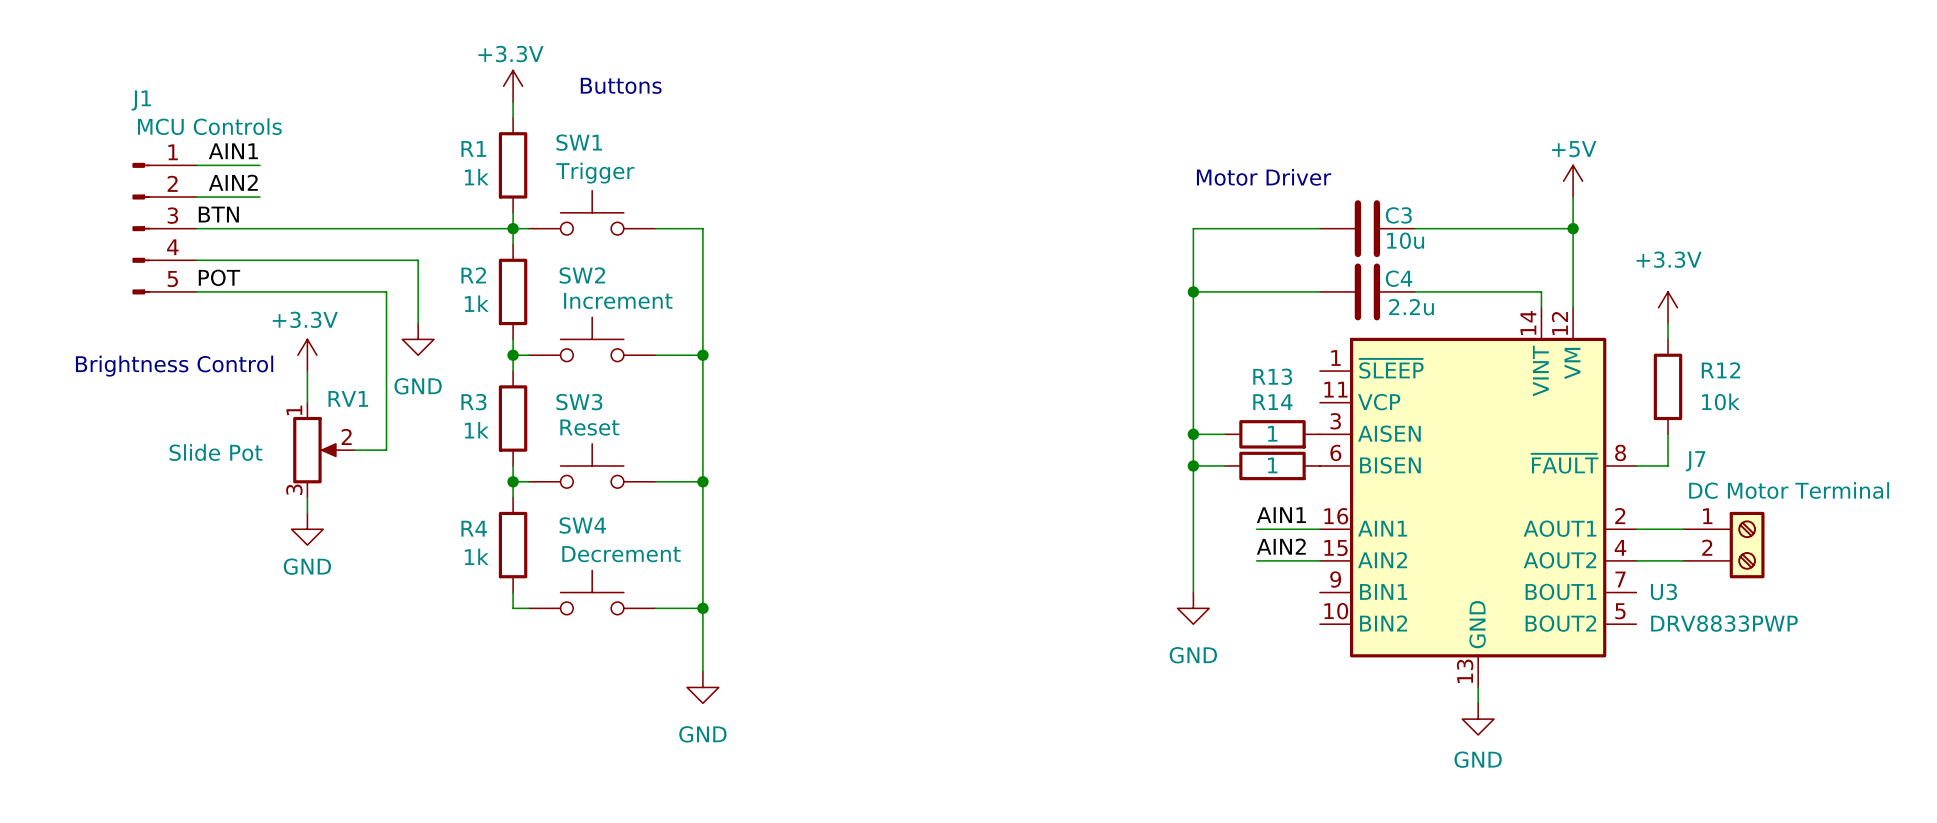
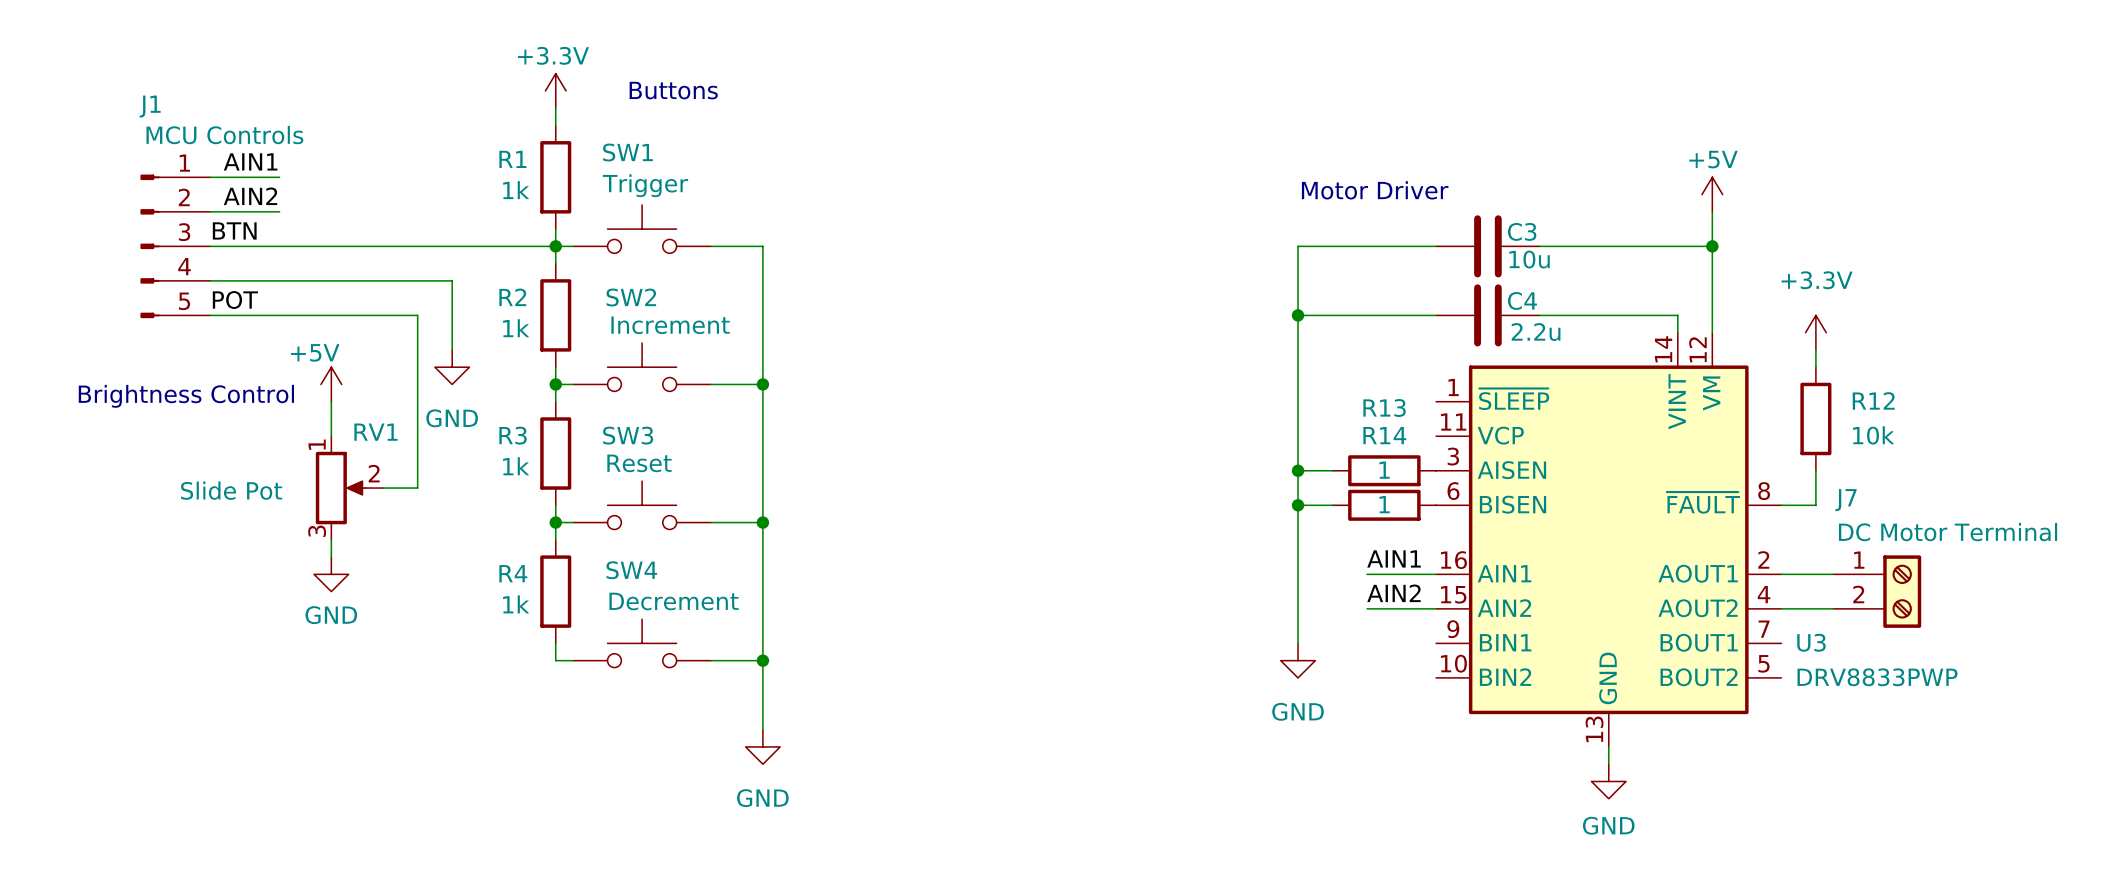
power symbol: +3.3V (307, 355) -> +5V (331, 384)

